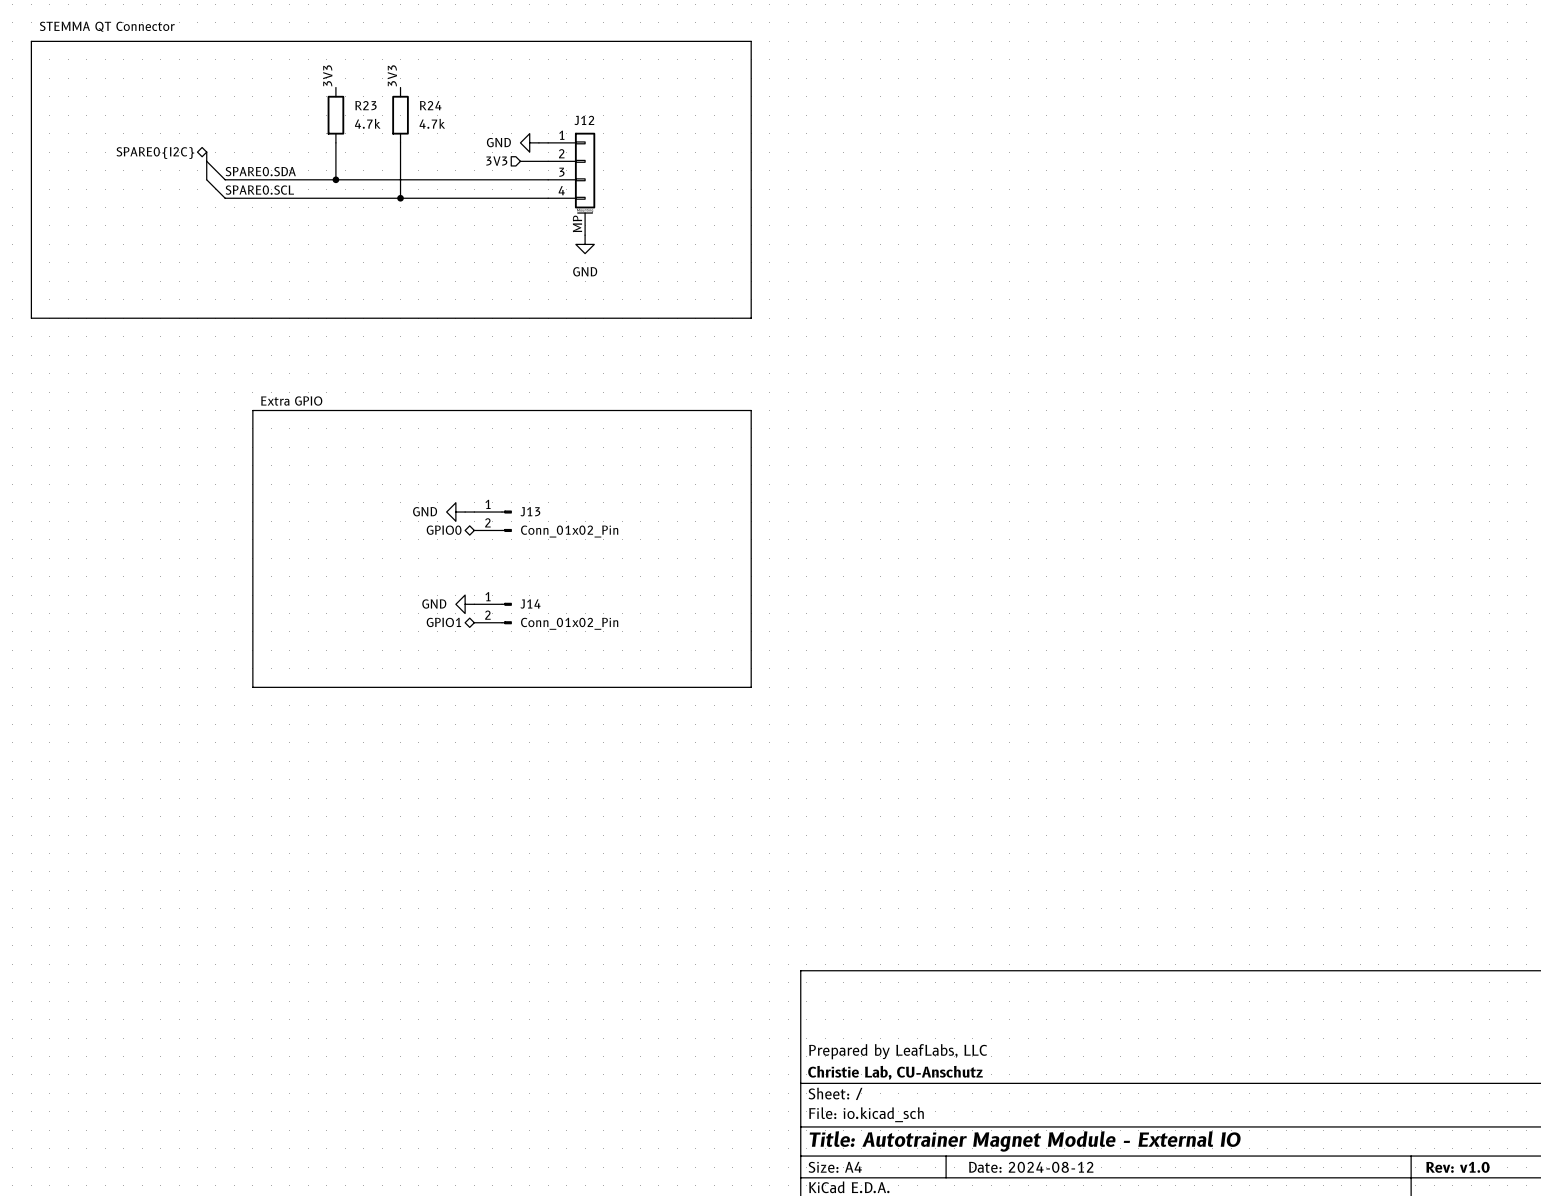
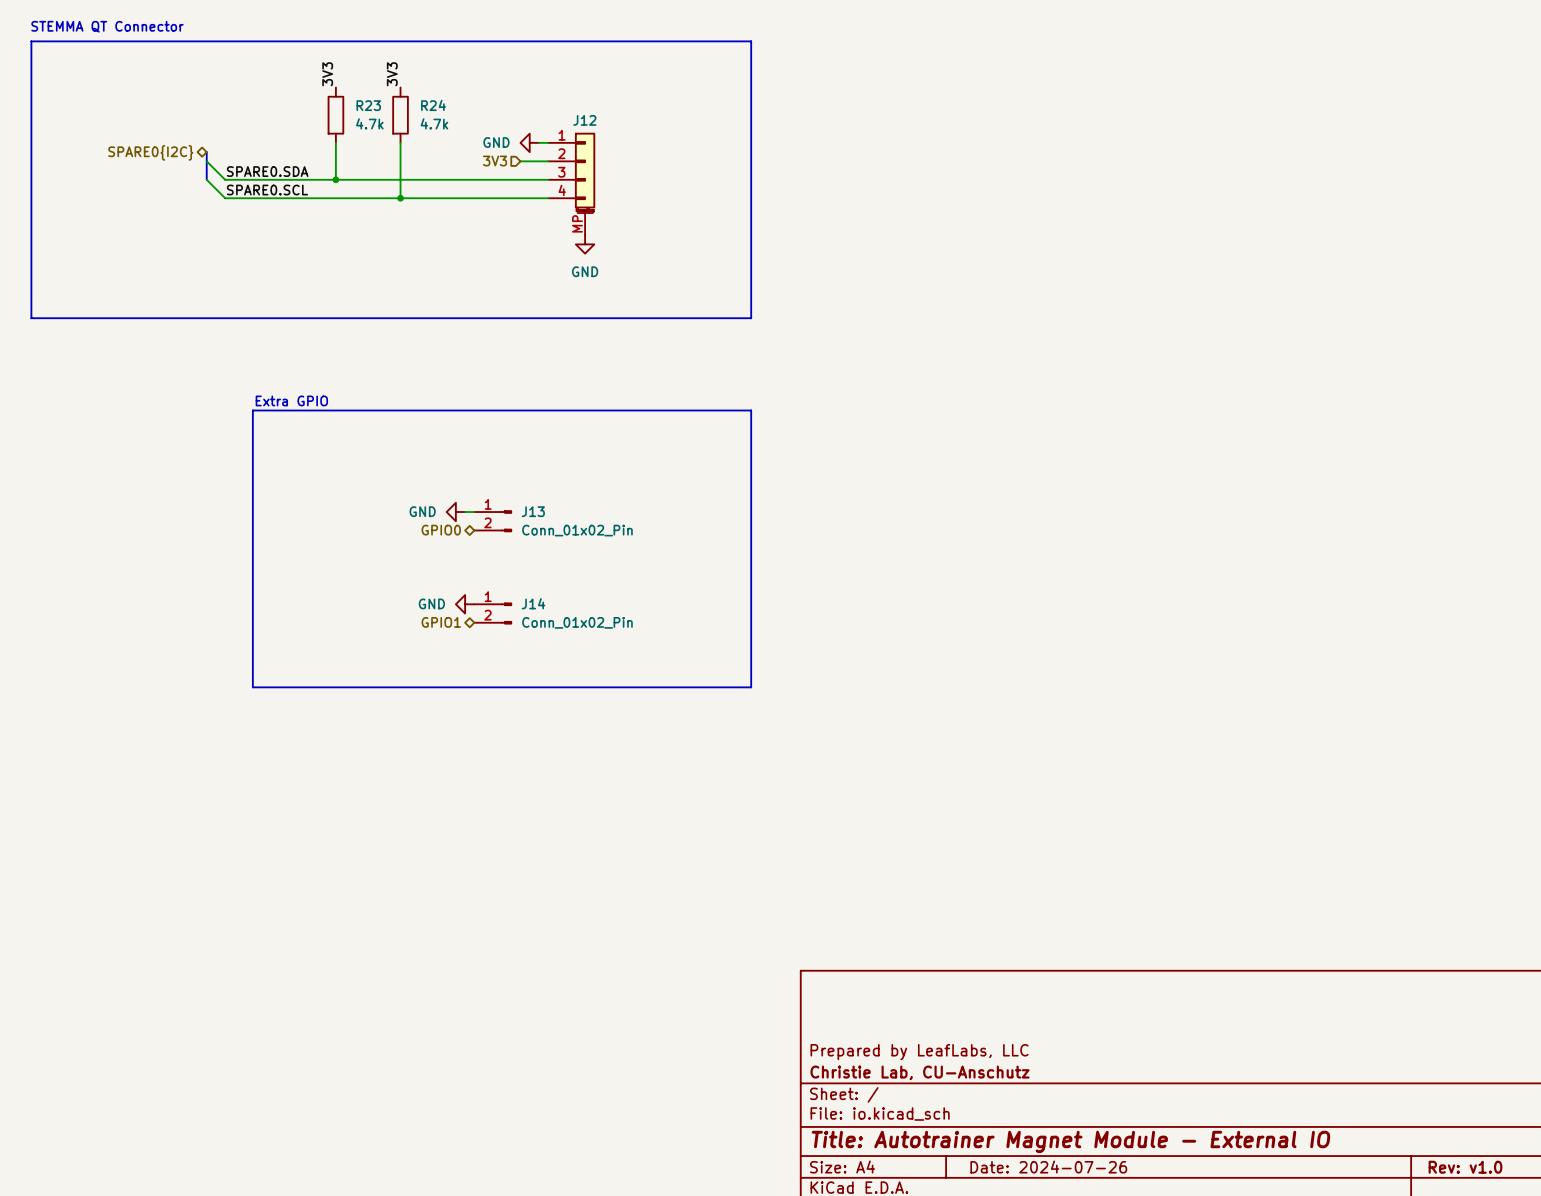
title block: Date: 2024-08-12 (1031, 1167) -> Date: 2024-07-26 (1048, 1166)

